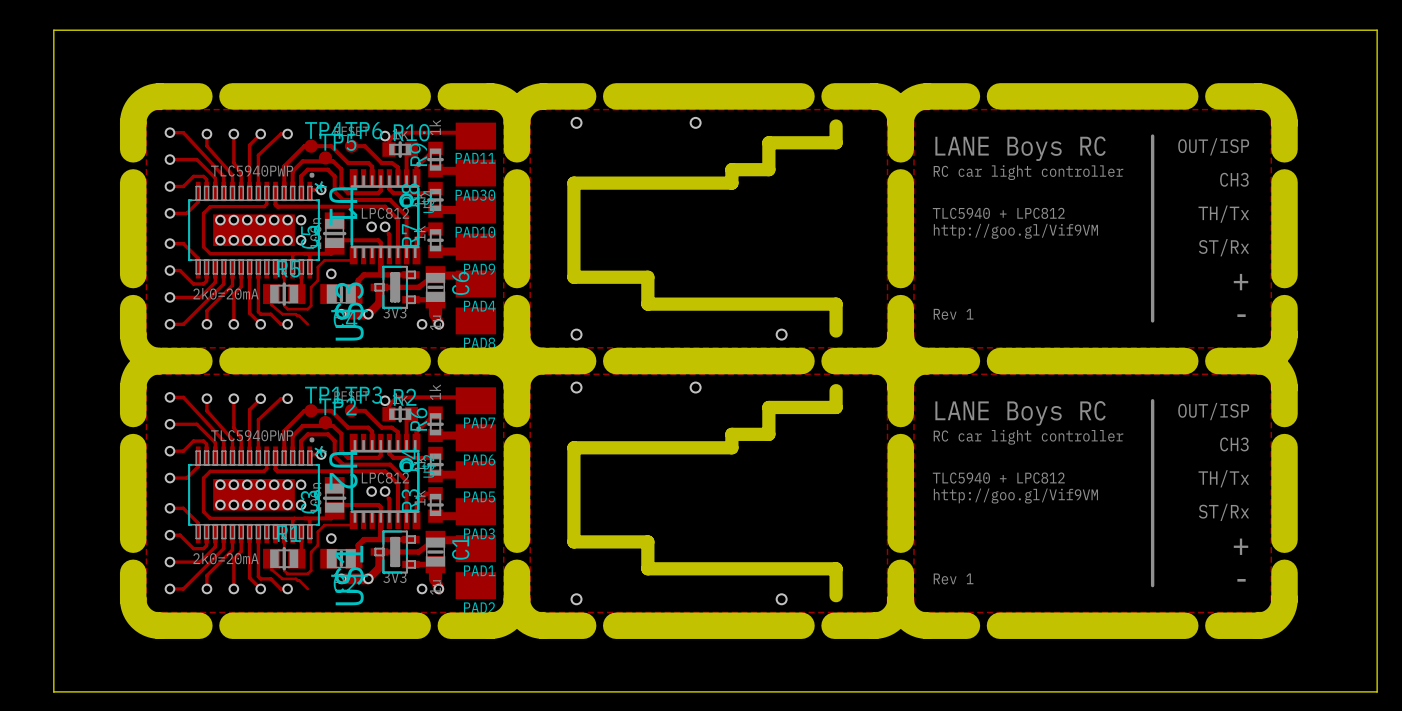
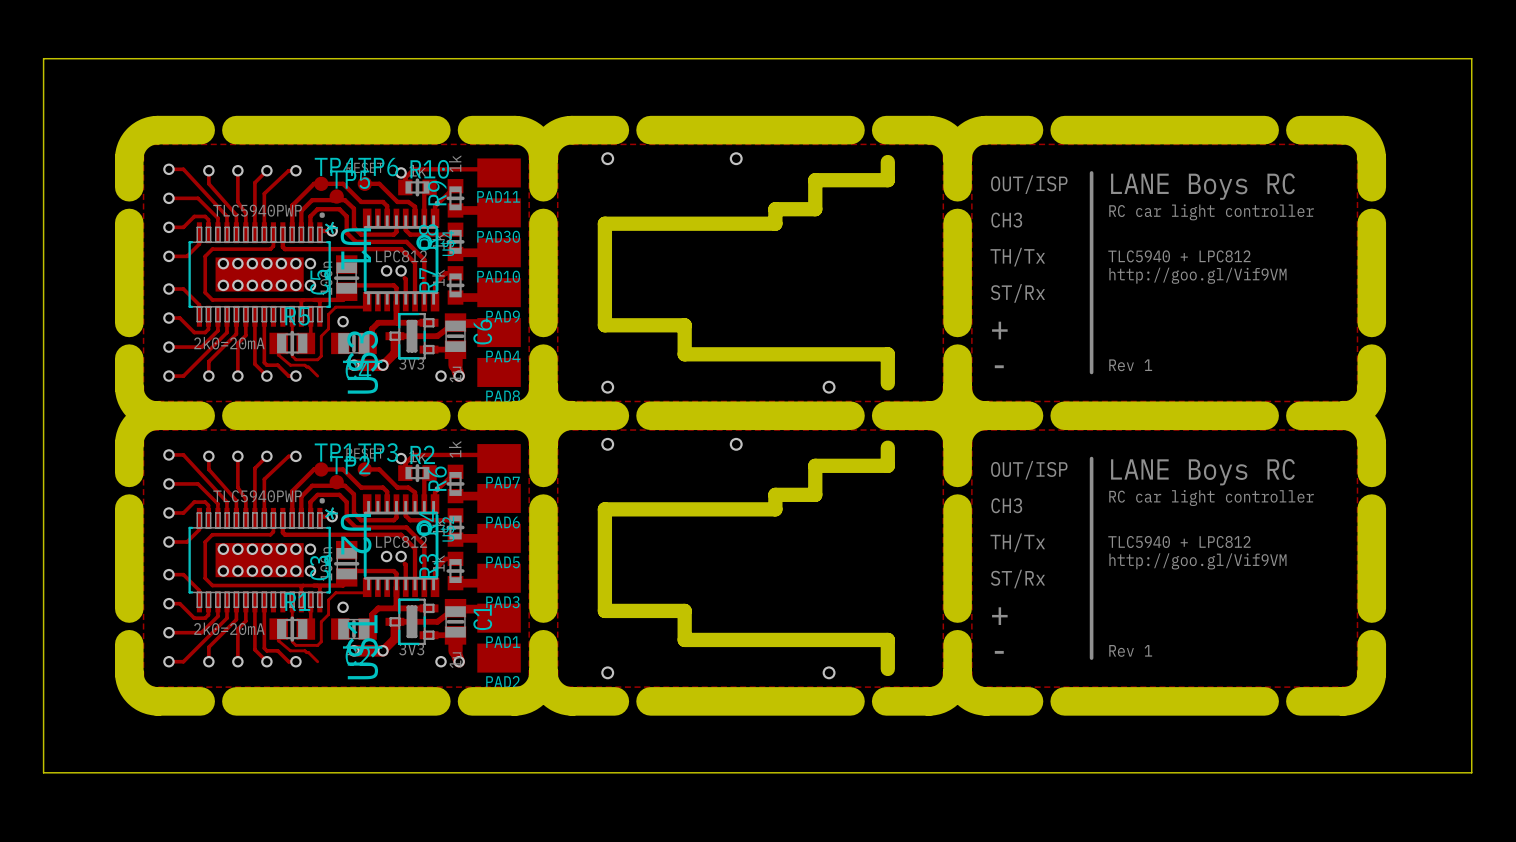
line: (1152, 136) (1152, 320) -> (1091, 172) (1091, 372)
text: none -> OUT/ISP (1029, 184)
text: OUT/ISP (1213, 146) -> none
text position: LANE Boys RC (1020, 148) -> LANE Boys RC (1202, 186)
text position: RC car light controller (1028, 172) -> RC car light controller (1211, 212)
text: none -> CH3 (1006, 220)
text: CH3 (1234, 179) -> none
text position: TLC5940 + LPC812 (998, 213) -> TLC5940 + LPC812 (1179, 256)
text: none -> TH/Tx (1017, 257)
text: TH/Tx (1223, 214) -> none
text position: http://goo.gl/Vif9VM (1015, 231) -> http://goo.gl/Vif9VM (1197, 275)
text: none -> ST/Rx (1017, 293)
text: ST/Rx (1223, 247) -> none
text: none -> + (999, 330)
text: + (1241, 282) -> none
text position: Rev 1 (953, 314) -> Rev 1 (1130, 365)
text: none -> - (999, 366)
text: - (1241, 315) -> none
line: (1152, 400) (1152, 585) -> (1091, 458) (1091, 658)
text: none -> OUT/ISP (1029, 470)
text: OUT/ISP (1213, 411) -> none
text position: LANE Boys RC (1020, 413) -> LANE Boys RC (1202, 472)
text position: RC car light controller (1028, 437) -> RC car light controller (1211, 498)
text: none -> CH3 (1006, 505)
text: CH3 (1234, 444) -> none
text: none -> TH/Tx (1017, 542)
text position: TLC5940 + LPC812 (998, 478) -> TLC5940 + LPC812 (1179, 542)
text: TH/Tx (1223, 478) -> none
text position: http://goo.gl/Vif9VM (1015, 496) -> http://goo.gl/Vif9VM (1197, 561)
text: none -> ST/Rx (1017, 579)
text: ST/Rx (1223, 512) -> none
text: none -> + (999, 616)
text: + (1241, 546) -> none
text position: Rev 1 (953, 578) -> Rev 1 (1130, 650)
text: none -> - (999, 652)
text: - (1241, 580) -> none

